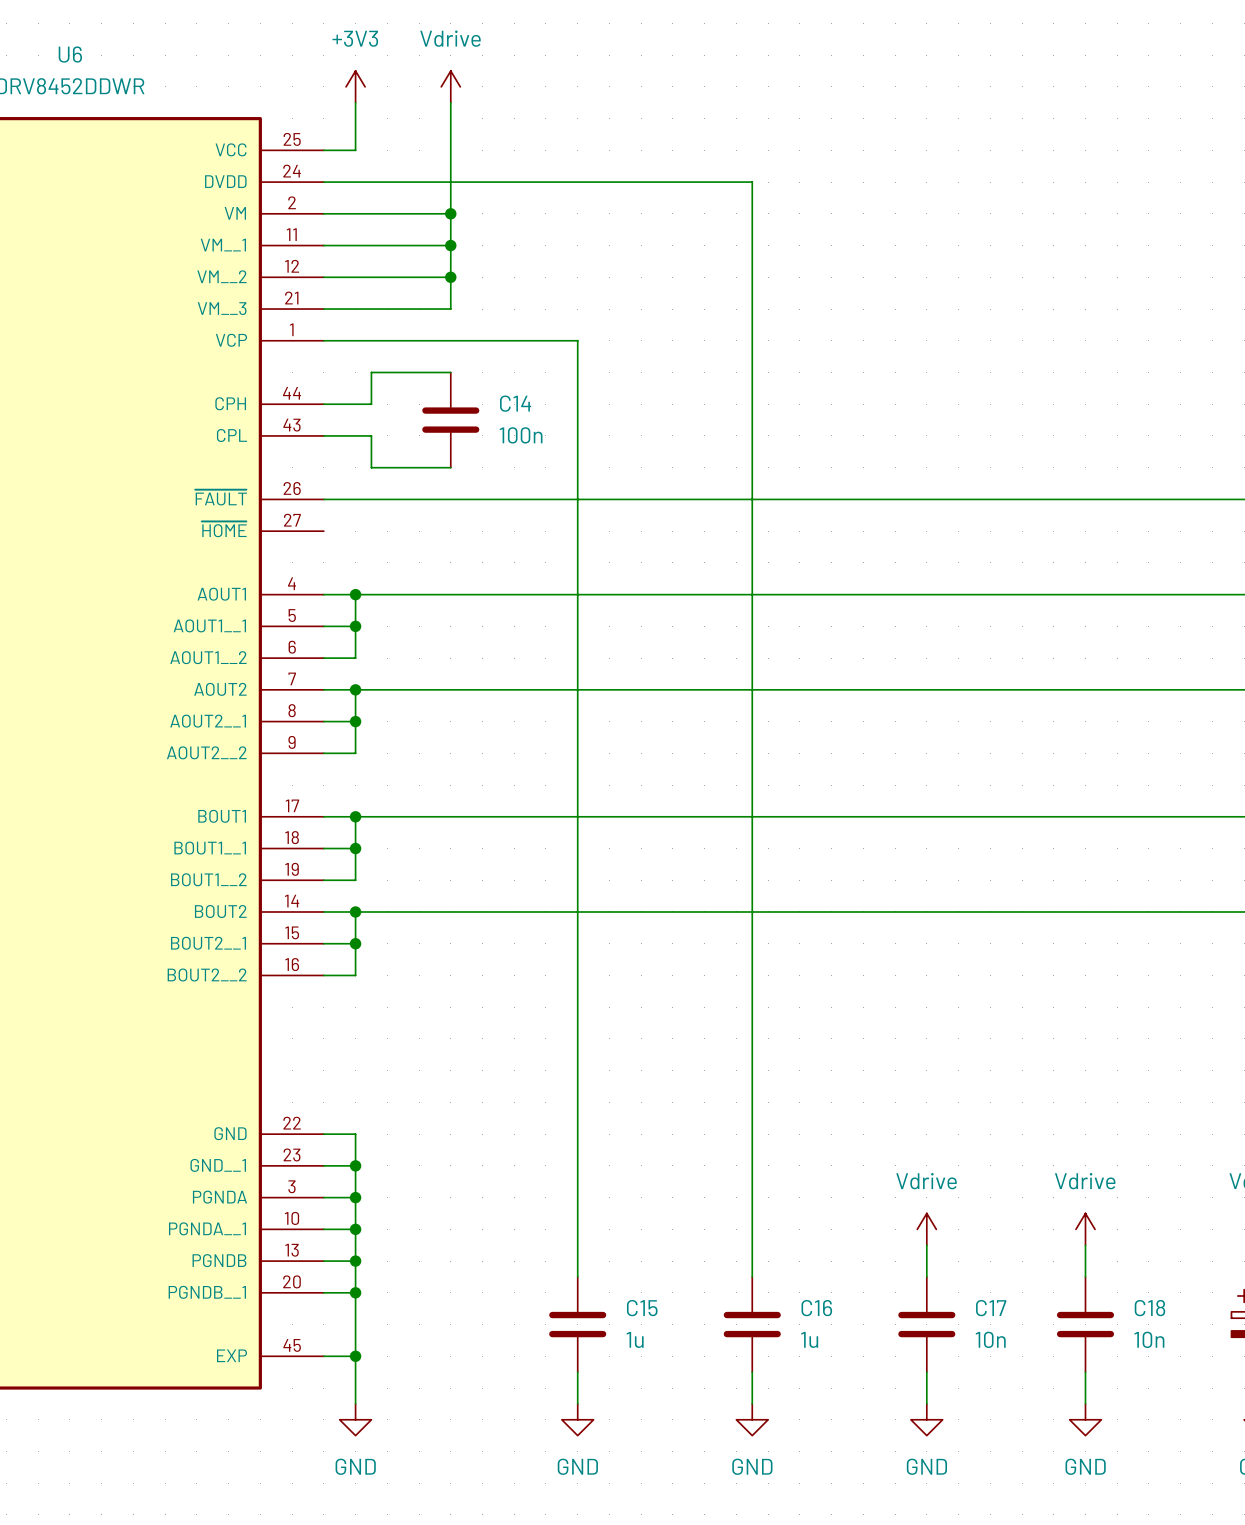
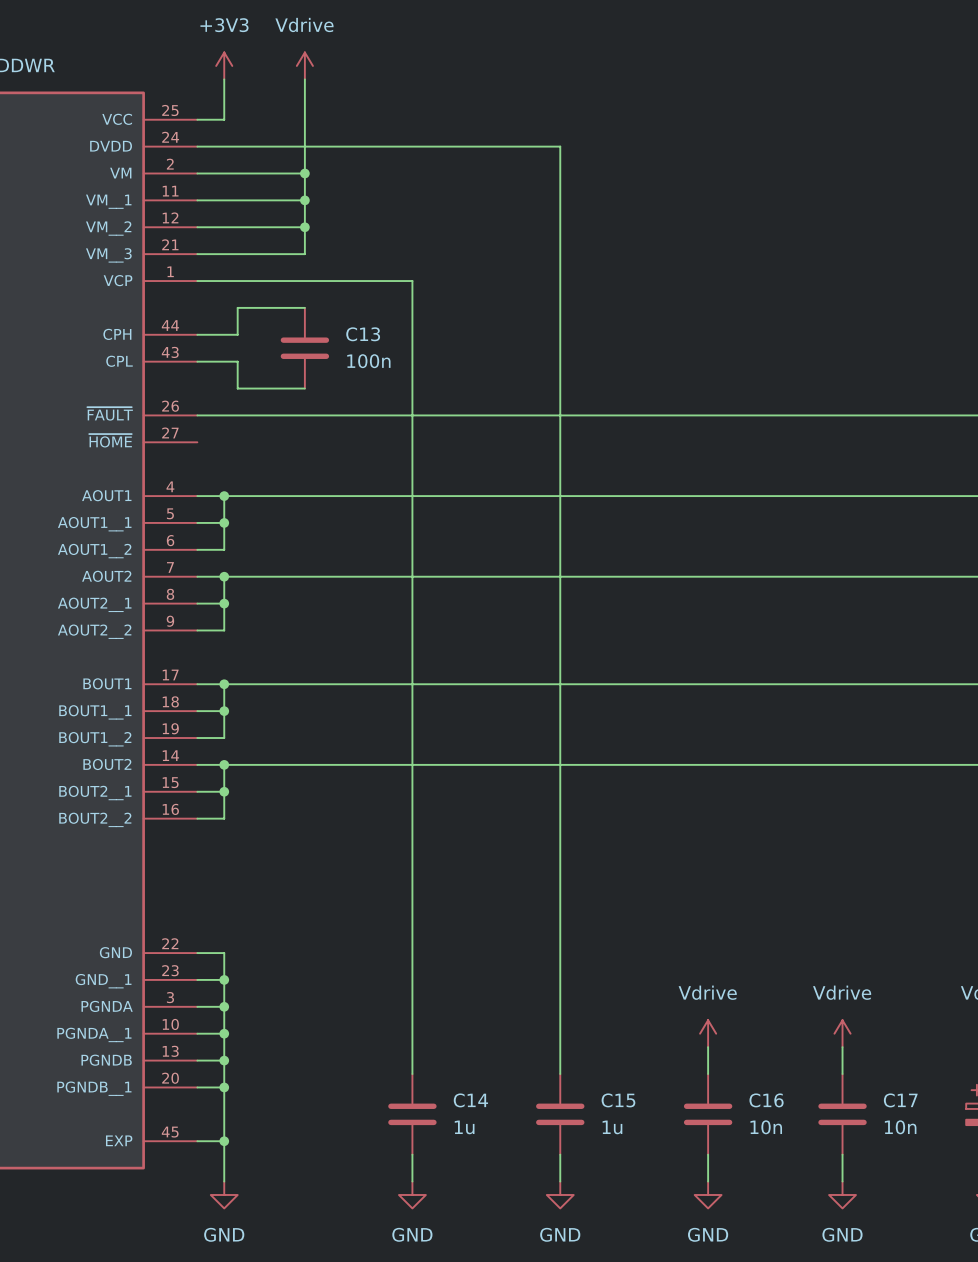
C14 name: C14 (515, 403) -> C13 (363, 334)
C15 name: C15 (642, 1308) -> C14 (470, 1100)
C16 name: C16 (816, 1308) -> C15 (618, 1100)
C17 name: C17 (991, 1308) -> C16 (766, 1100)
C18 name: C18 (1149, 1308) -> C17 (900, 1100)

